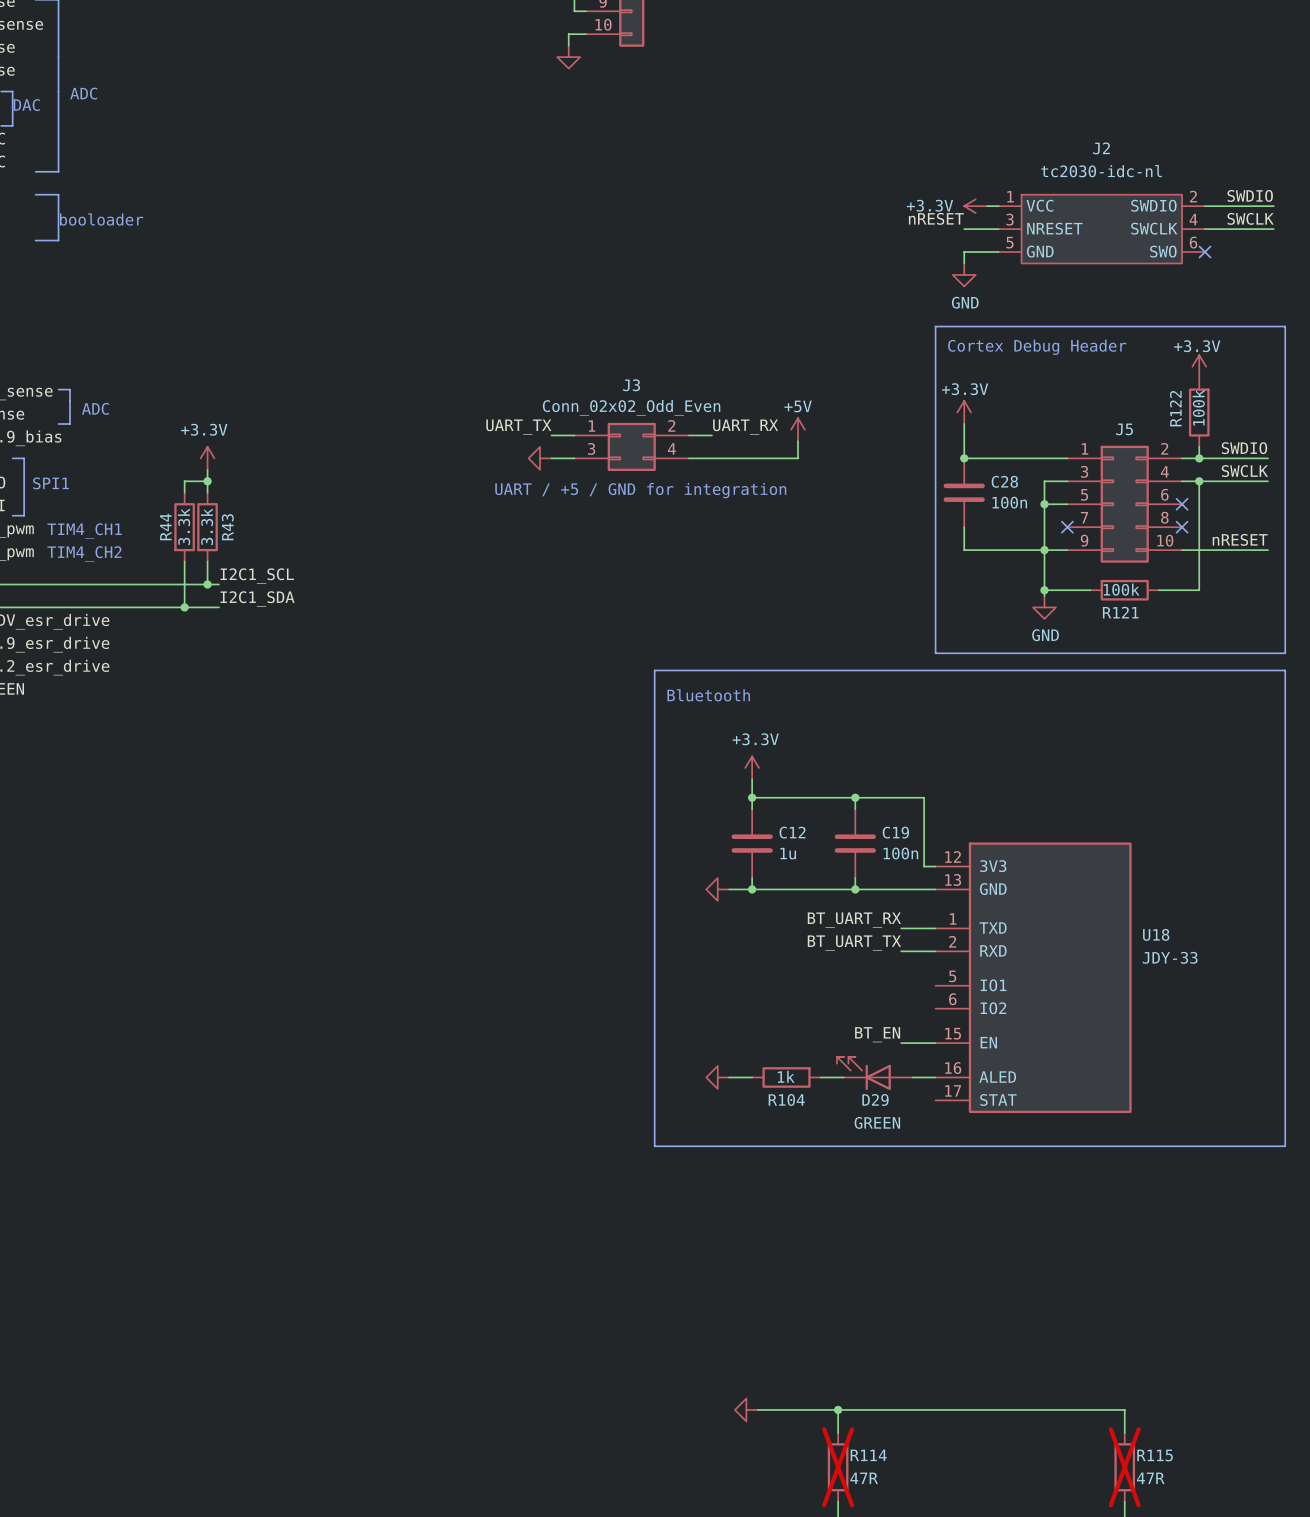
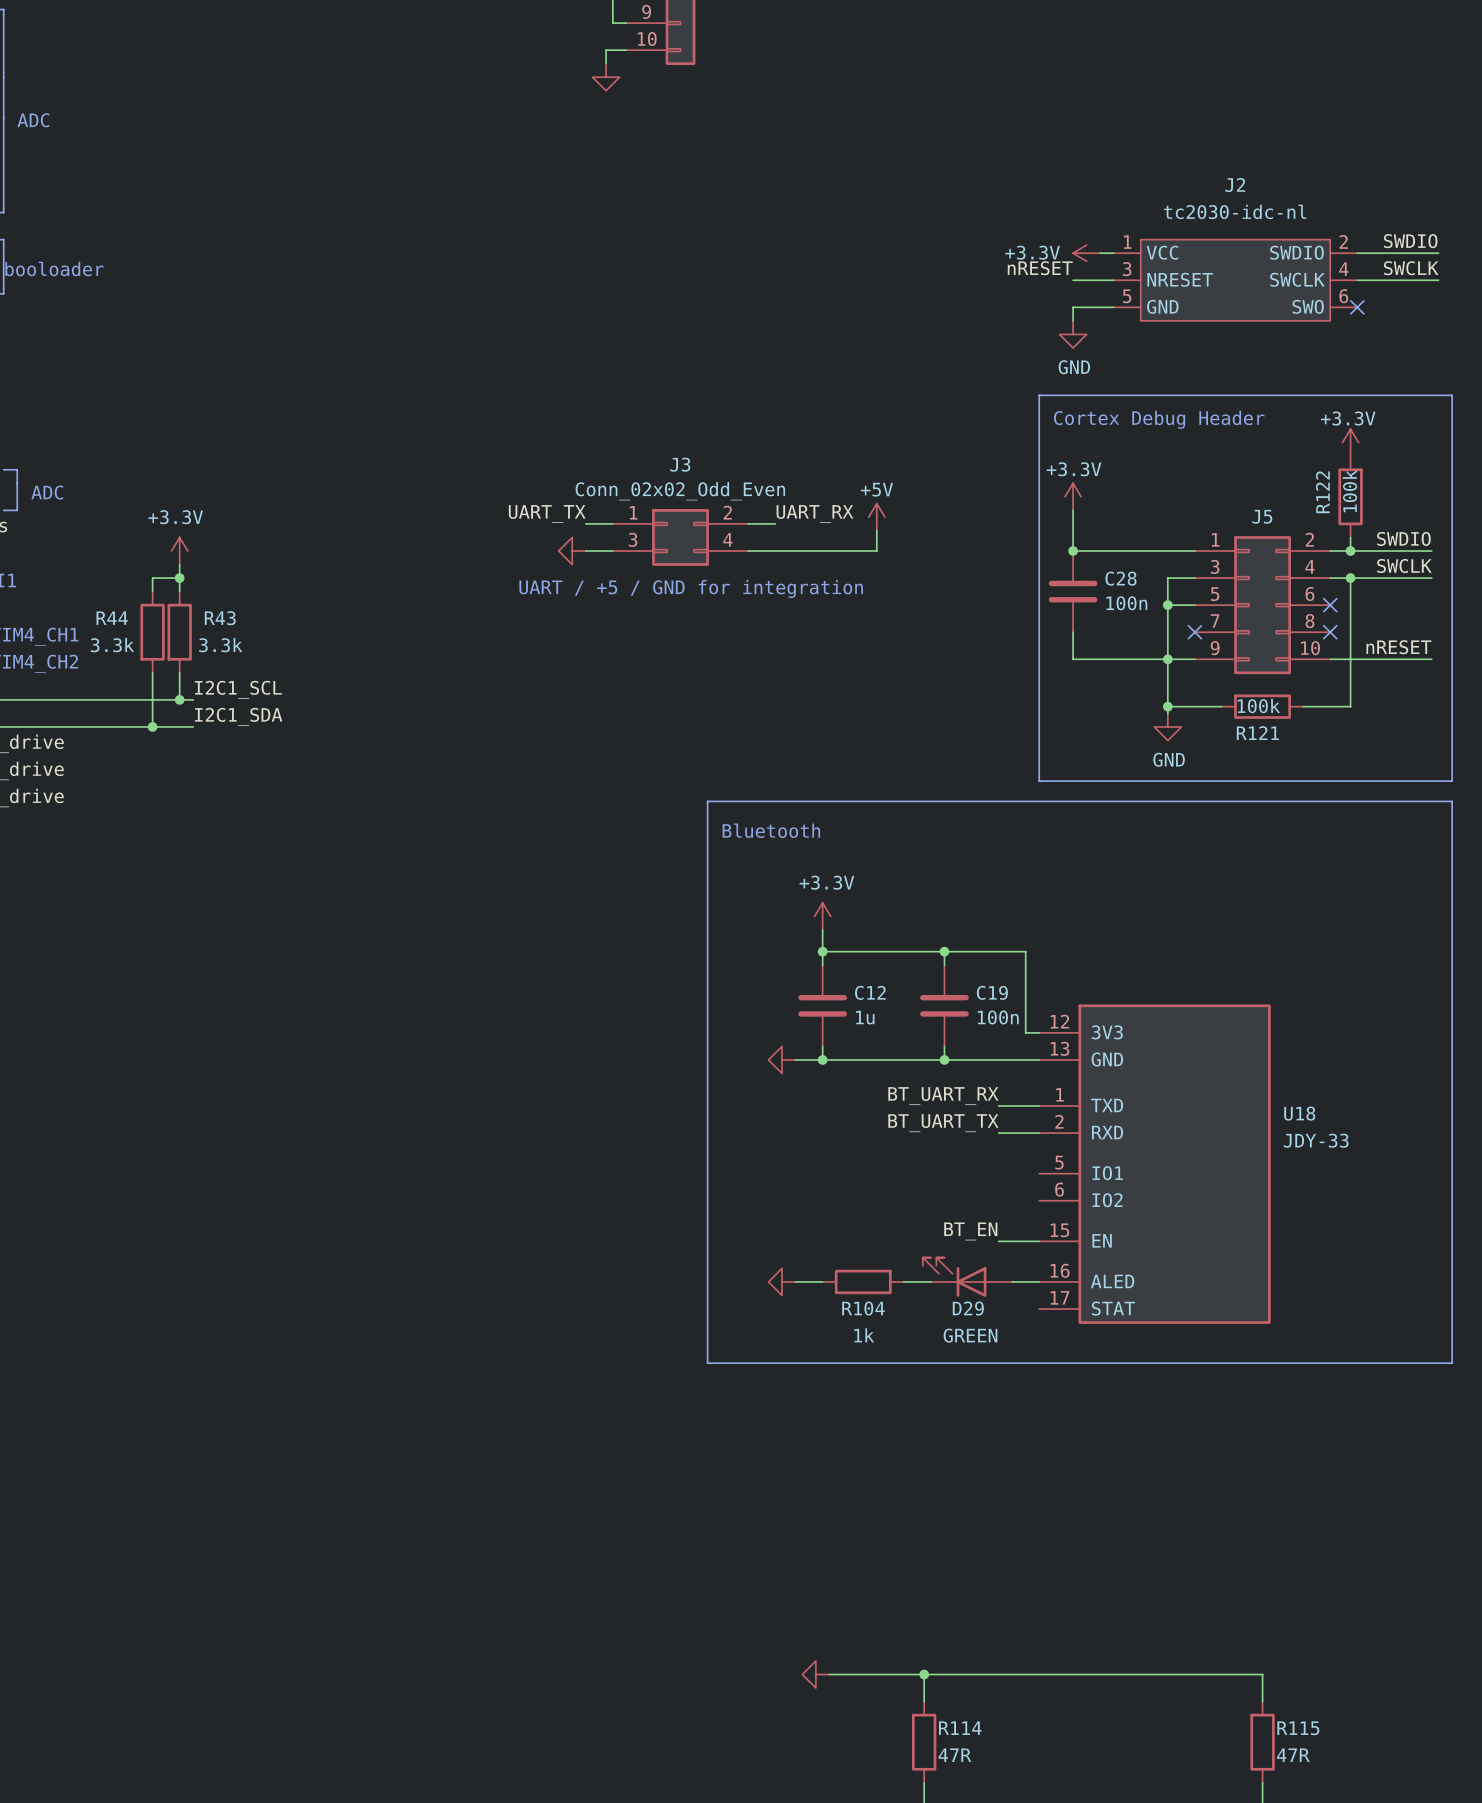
R44 value rotation: 0° (184, 526) -> 90° clockwise (112, 645)
R43 value rotation: 0° (207, 526) -> 90° clockwise (220, 645)
R44 name rotation: 0° (165, 527) -> 90° clockwise (112, 618)
R43 name rotation: 0° (227, 527) -> 90° clockwise (220, 618)
R104 value position: 1k (786, 1076) -> 1k (864, 1335)
R114 do-not-place cross: (838, 1467) -> none
R115 do-not-place cross: (1124, 1467) -> none

